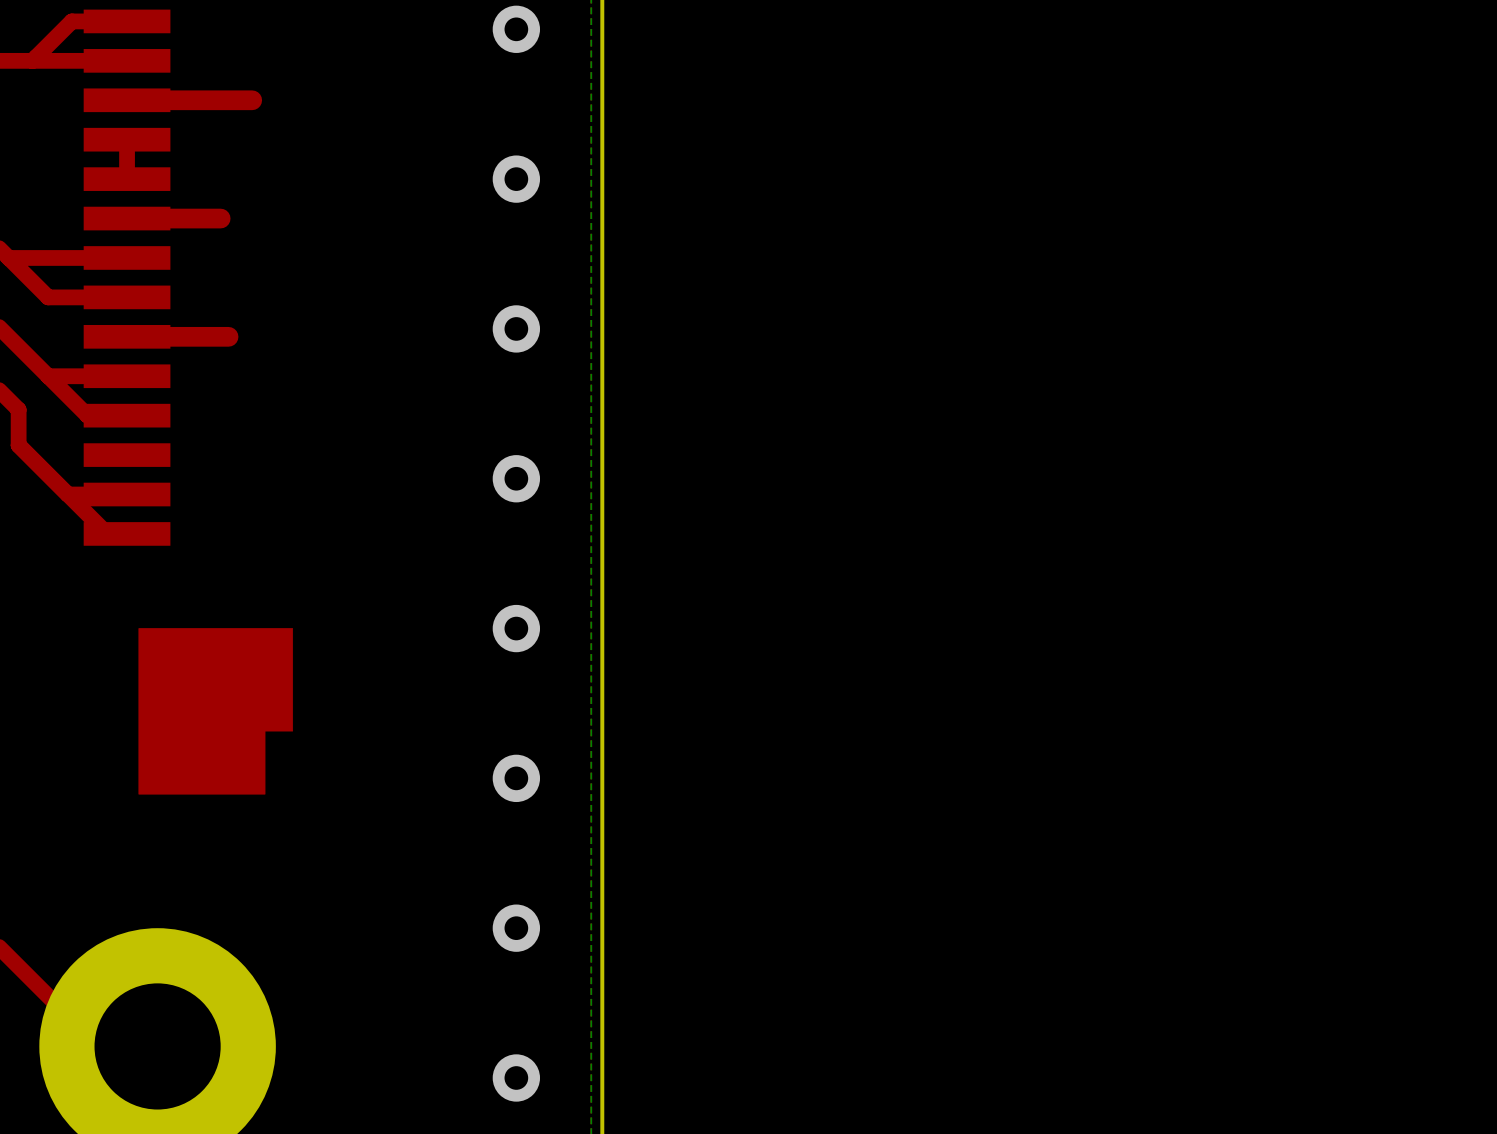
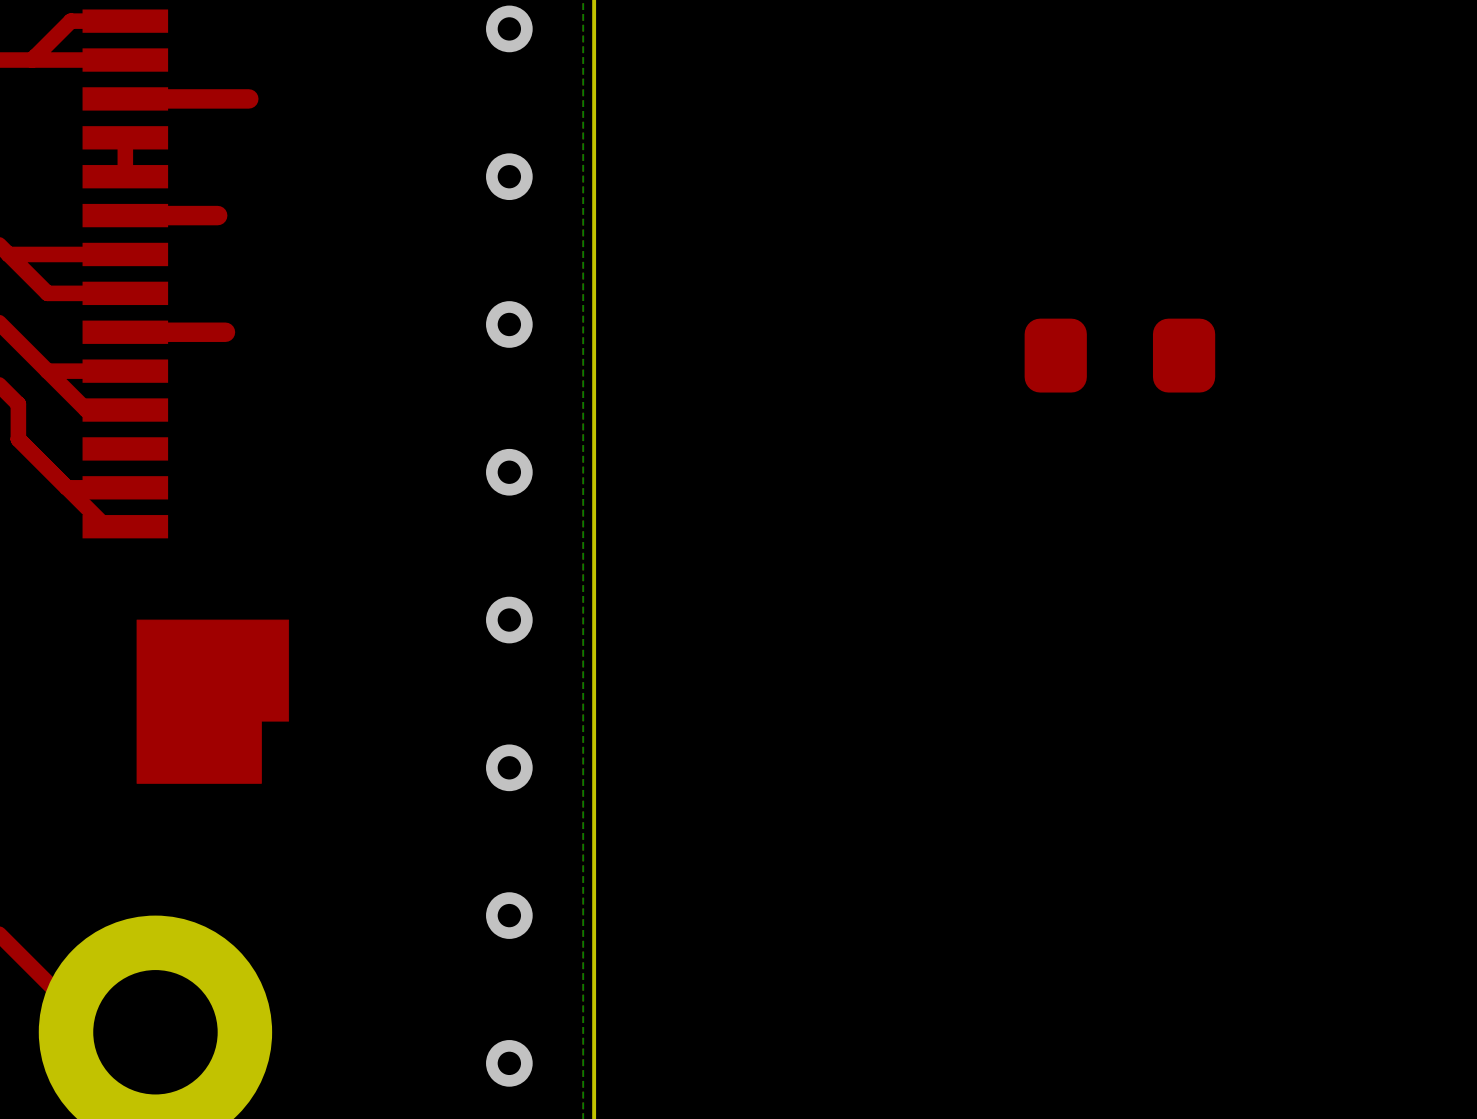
part: none -> (1119, 355)

